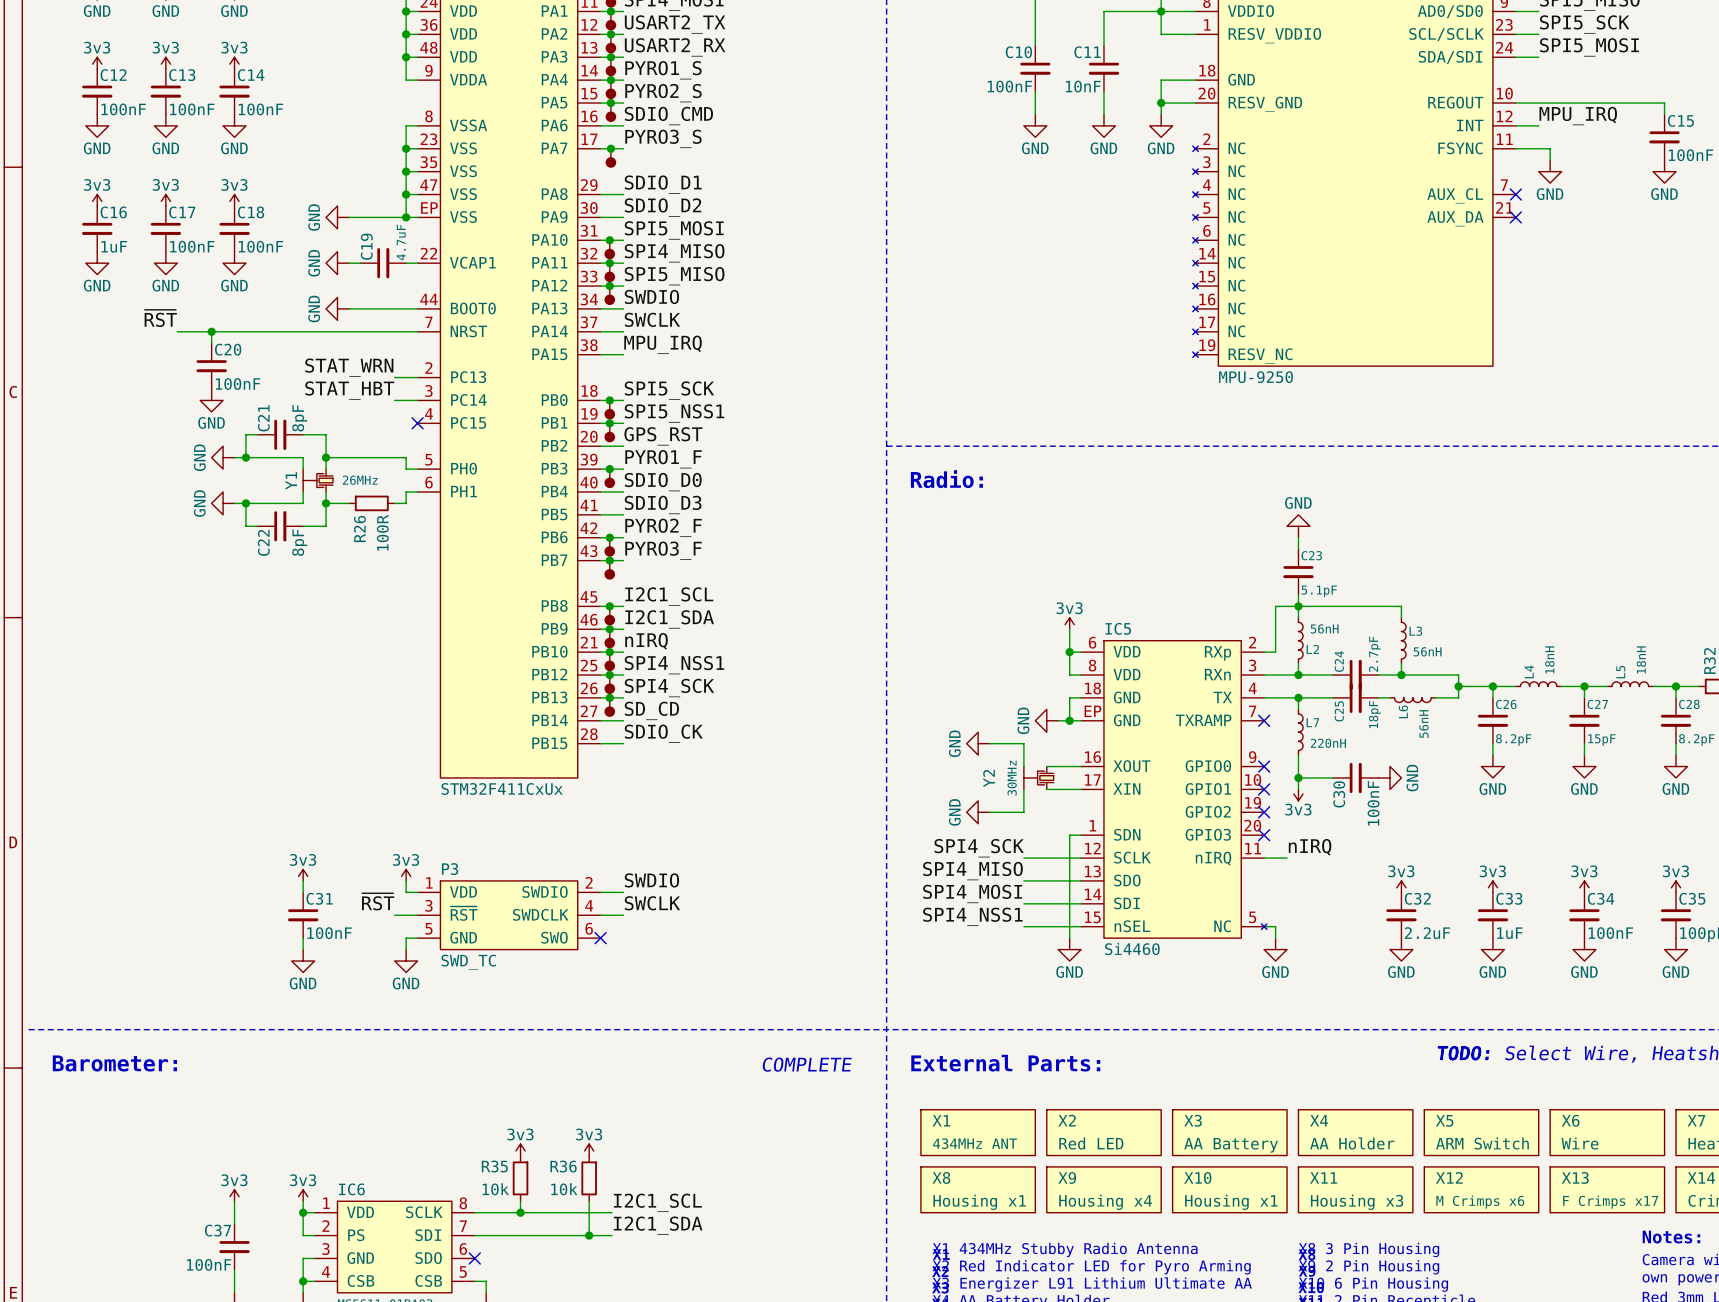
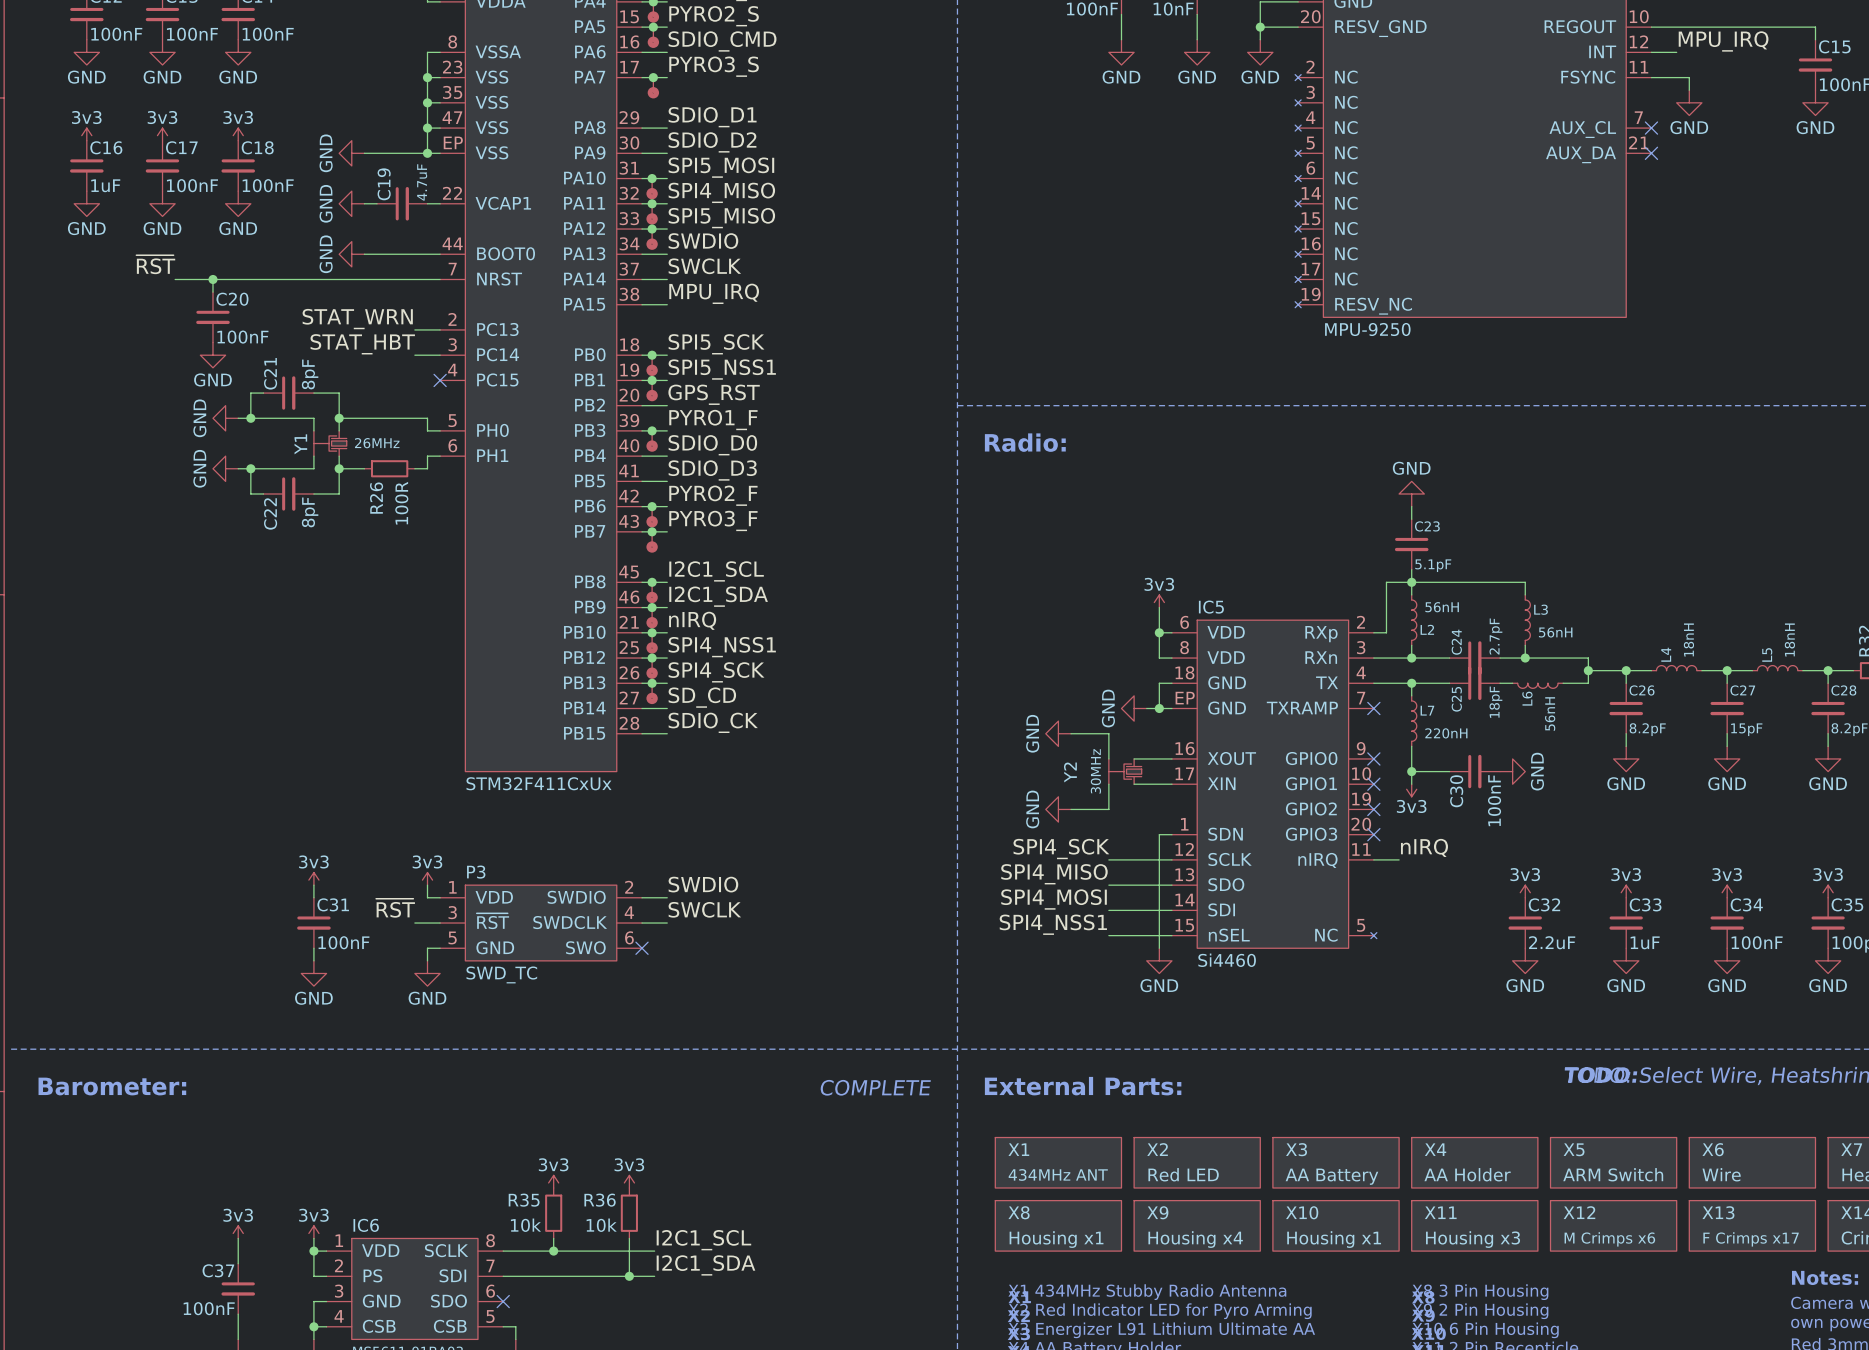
wire: (1264, 926) (1275, 926) (1275, 938) -> none
power symbol: GND (1275, 949) -> none

